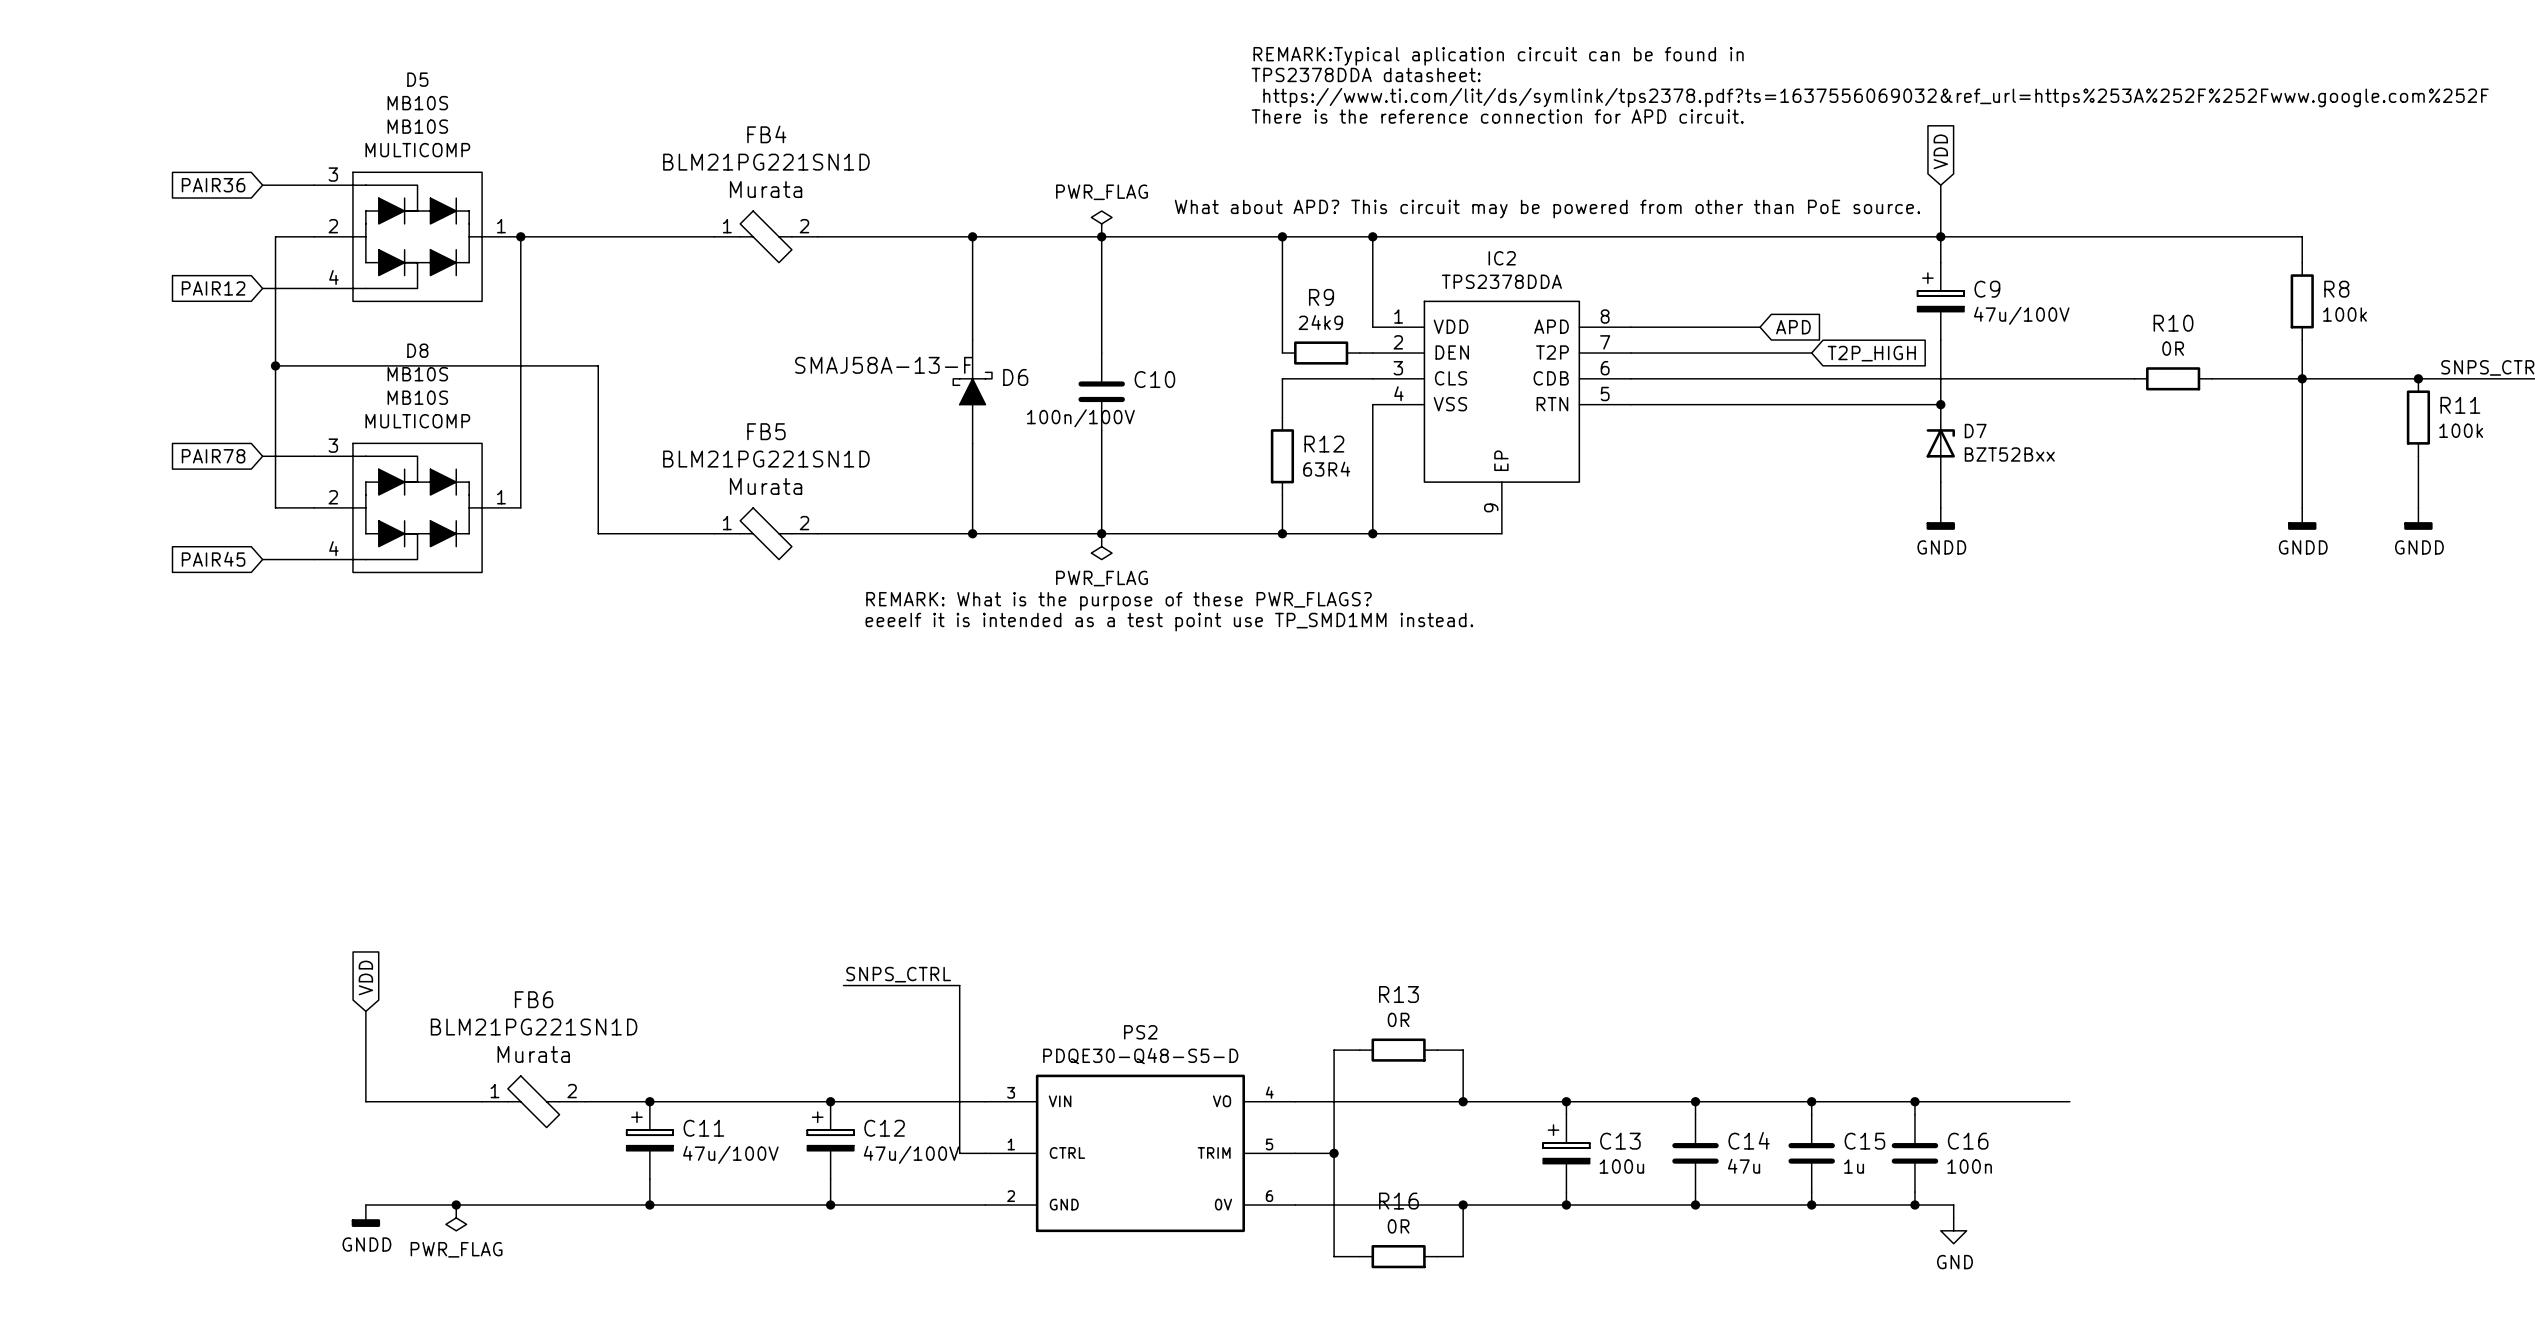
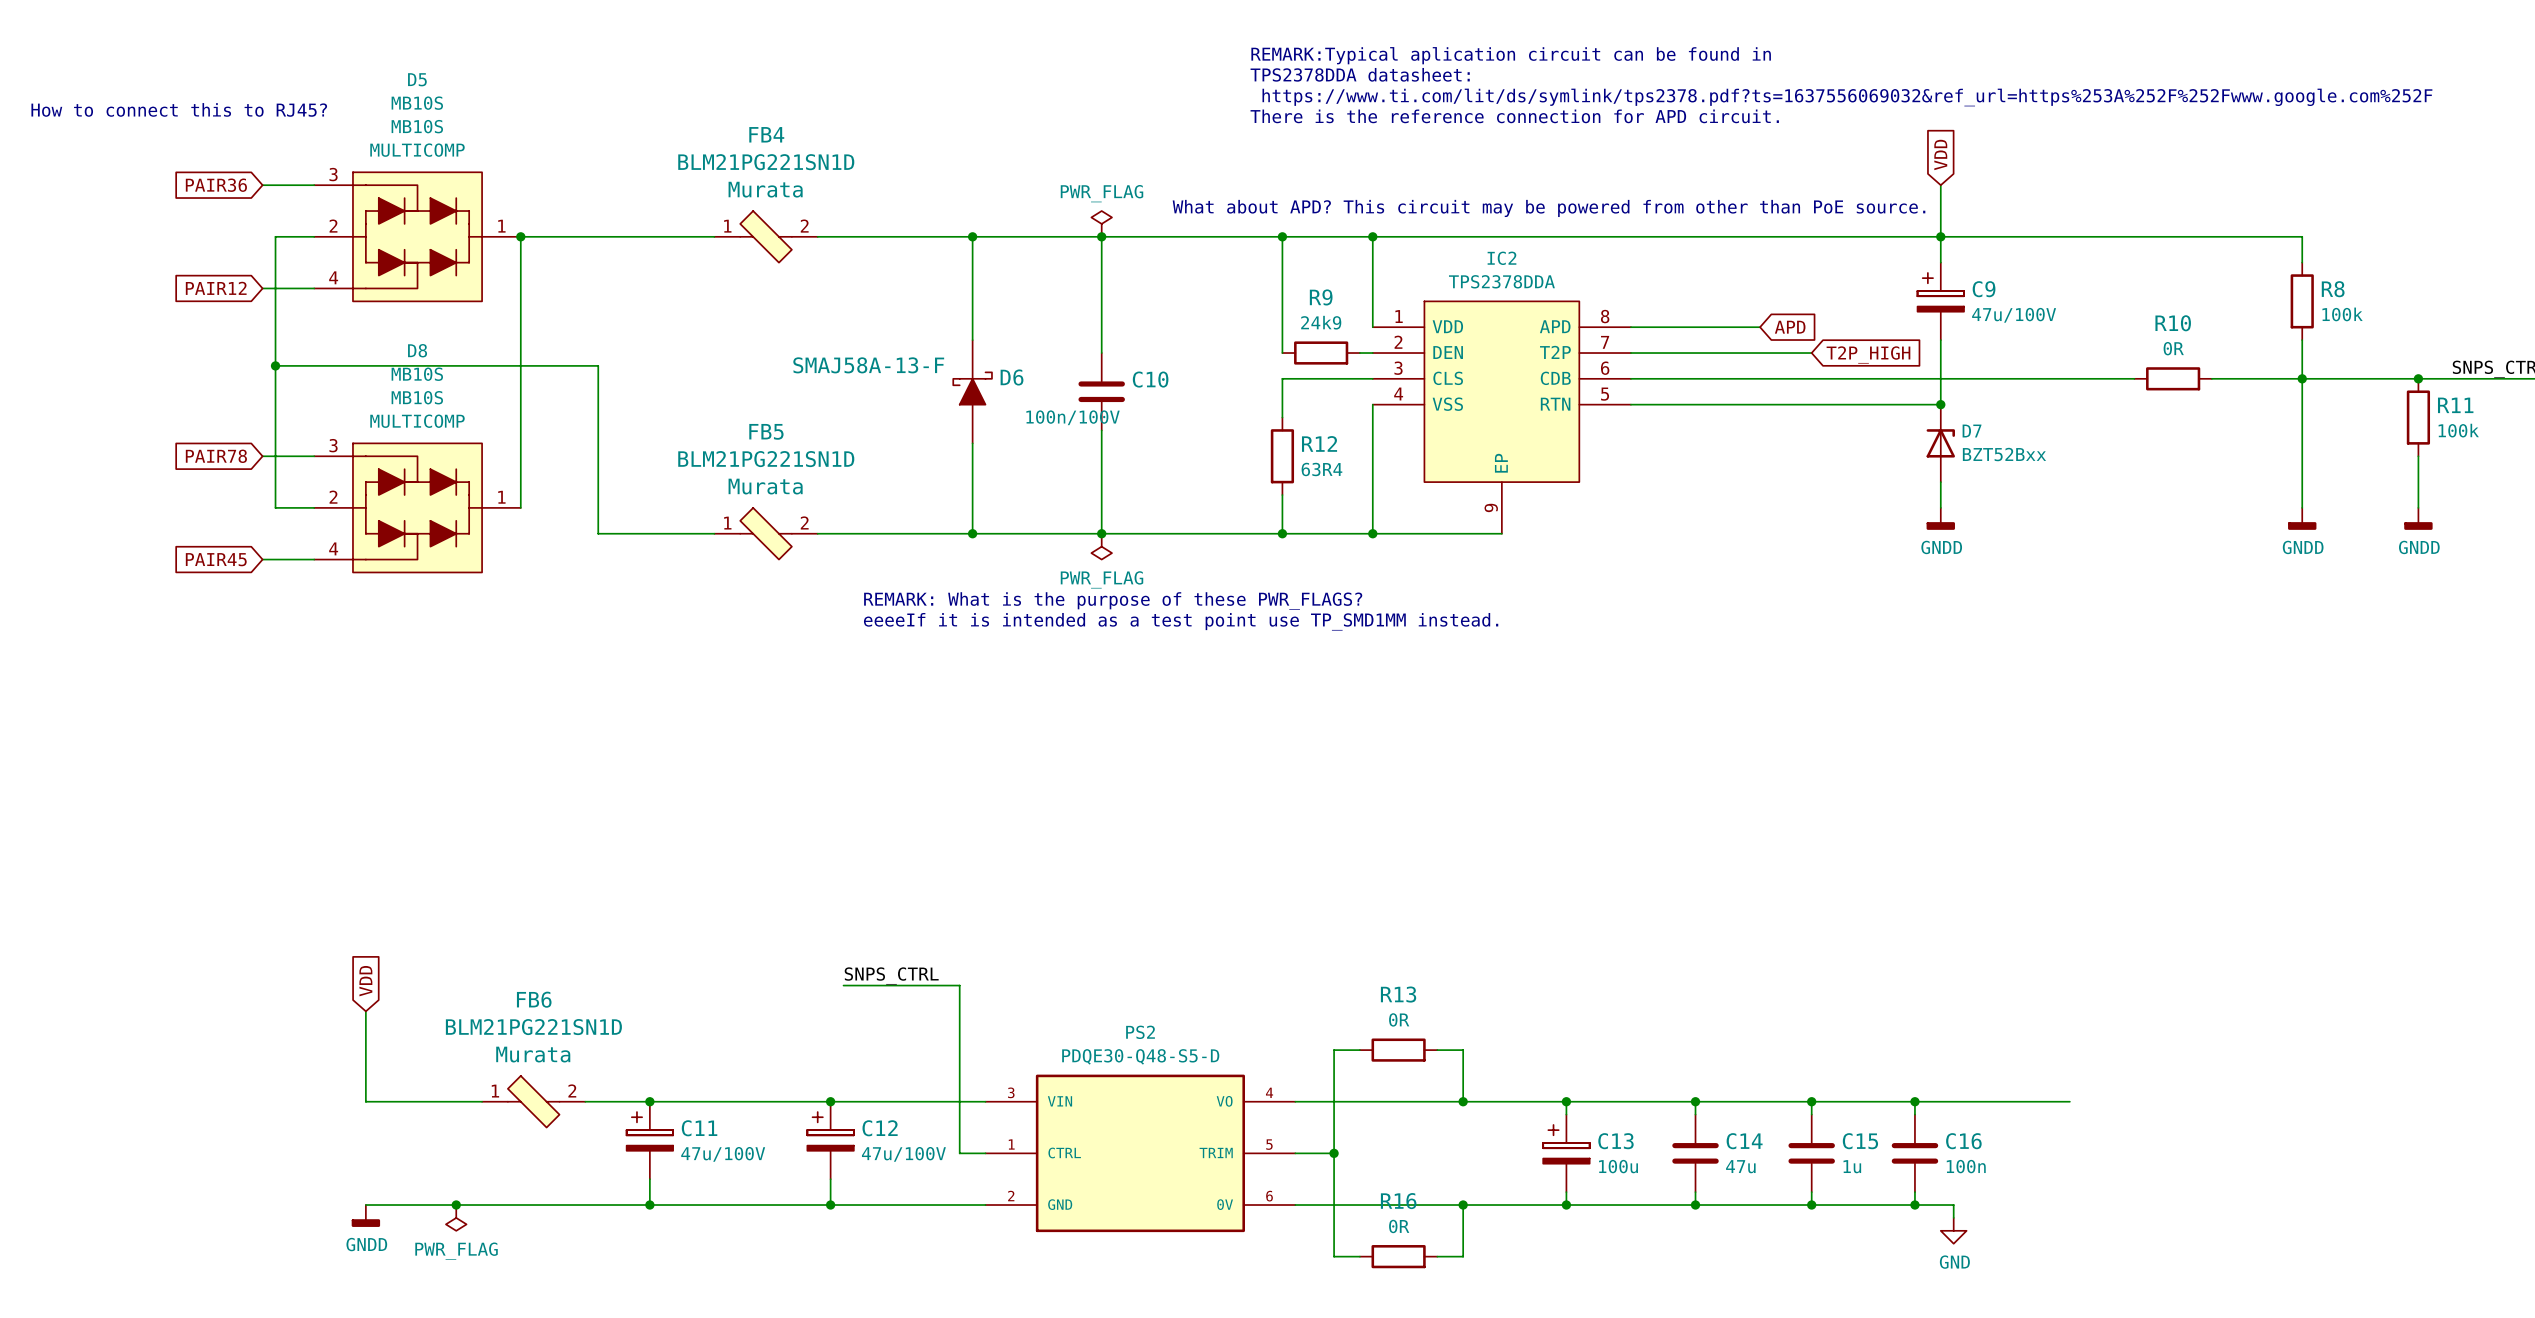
text: none -> How to connect this to RJ45? (179, 109)

